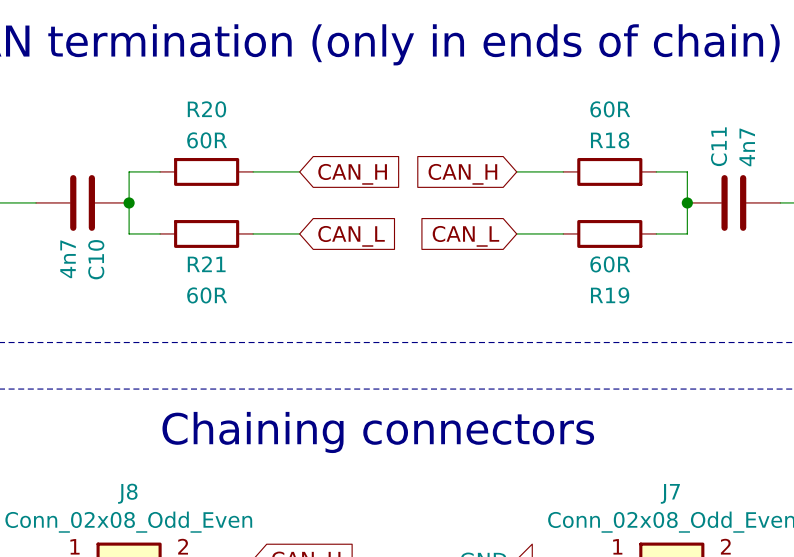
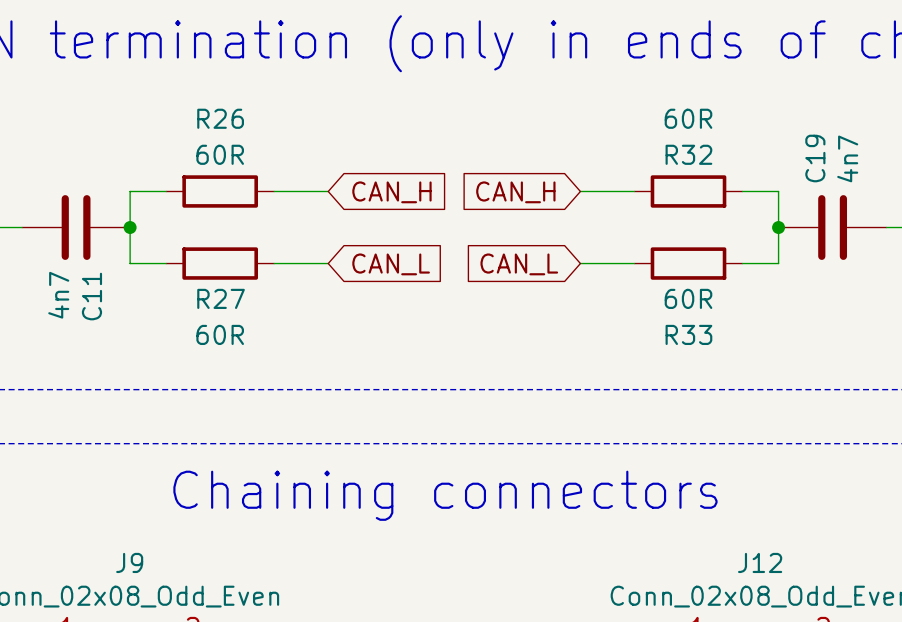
R20 name: R20 (206, 109) -> R26 (220, 118)
R18 name: R18 (610, 140) -> R32 (688, 154)
C11 name: C11 (719, 146) -> C19 (815, 158)
C10 name: C10 (96, 259) -> C11 (91, 296)
R21 name: R21 (206, 264) -> R27 (221, 298)
R19 name: R19 (610, 295) -> R33 (688, 334)
J8 name: J8 (127, 493) -> J9 (129, 562)
J7 name: J7 (670, 493) -> J12 (760, 562)

